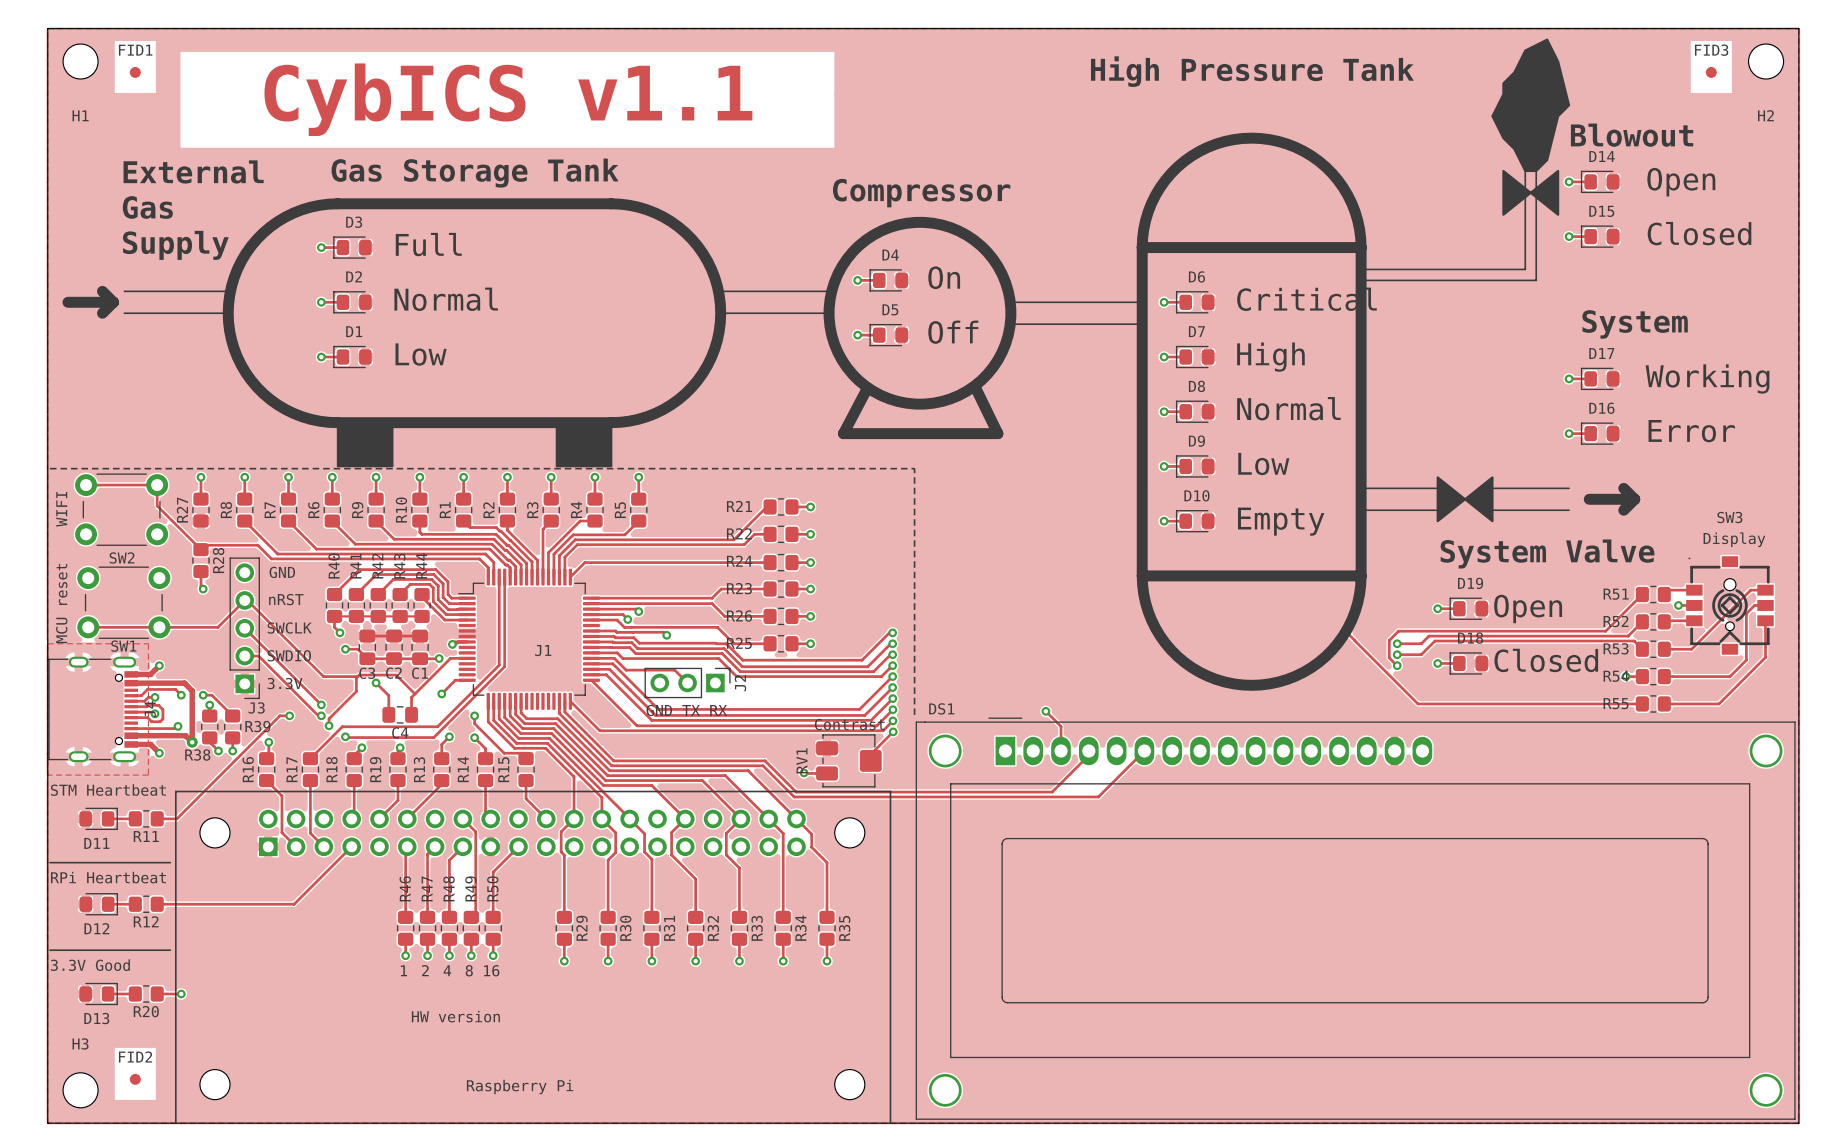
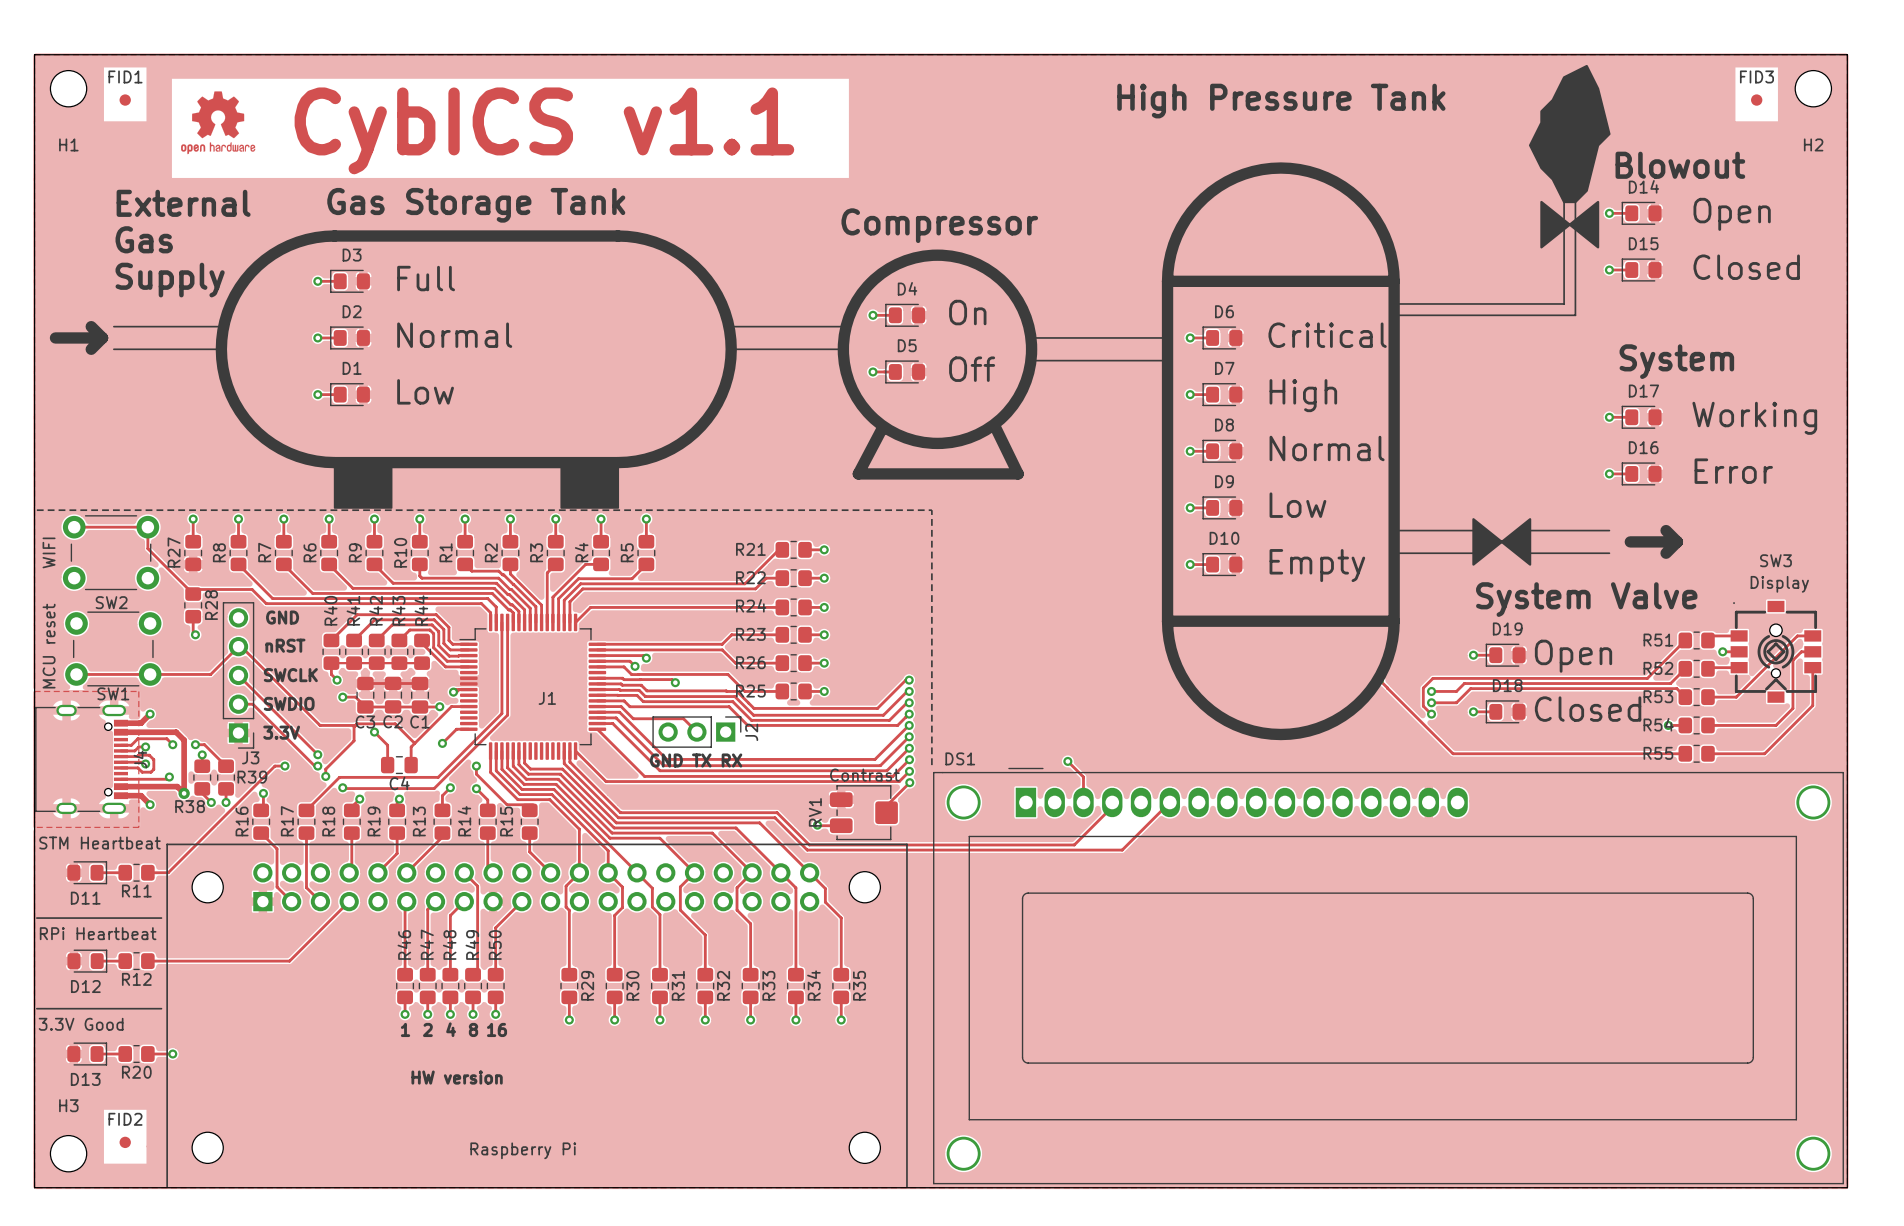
drawing: none -> [181, 91, 256, 155]
text position: CybICS v1.1 (508, 99) -> CybICS v1.1 (544, 130)

